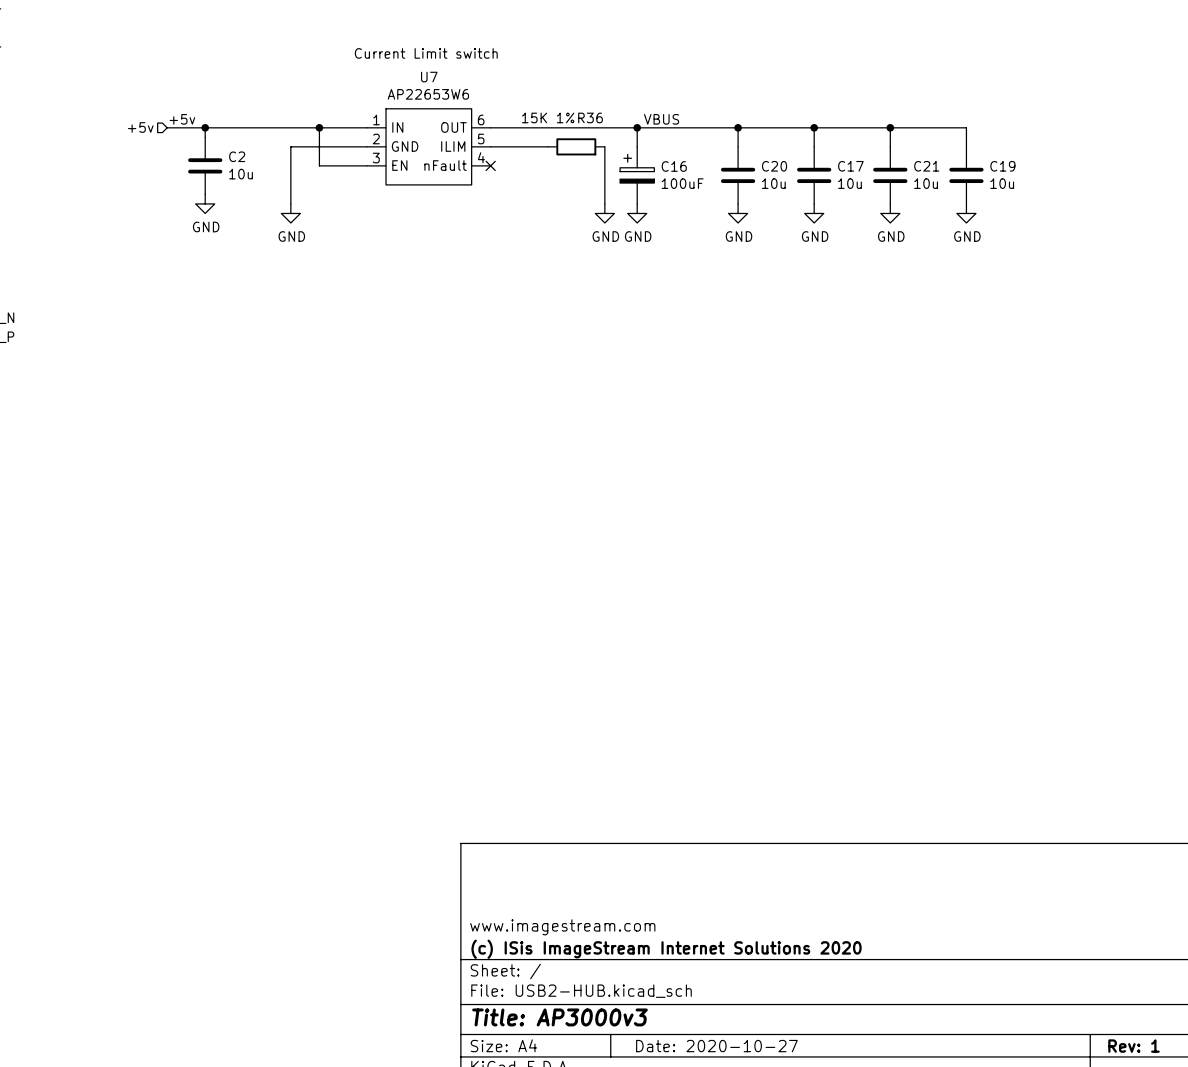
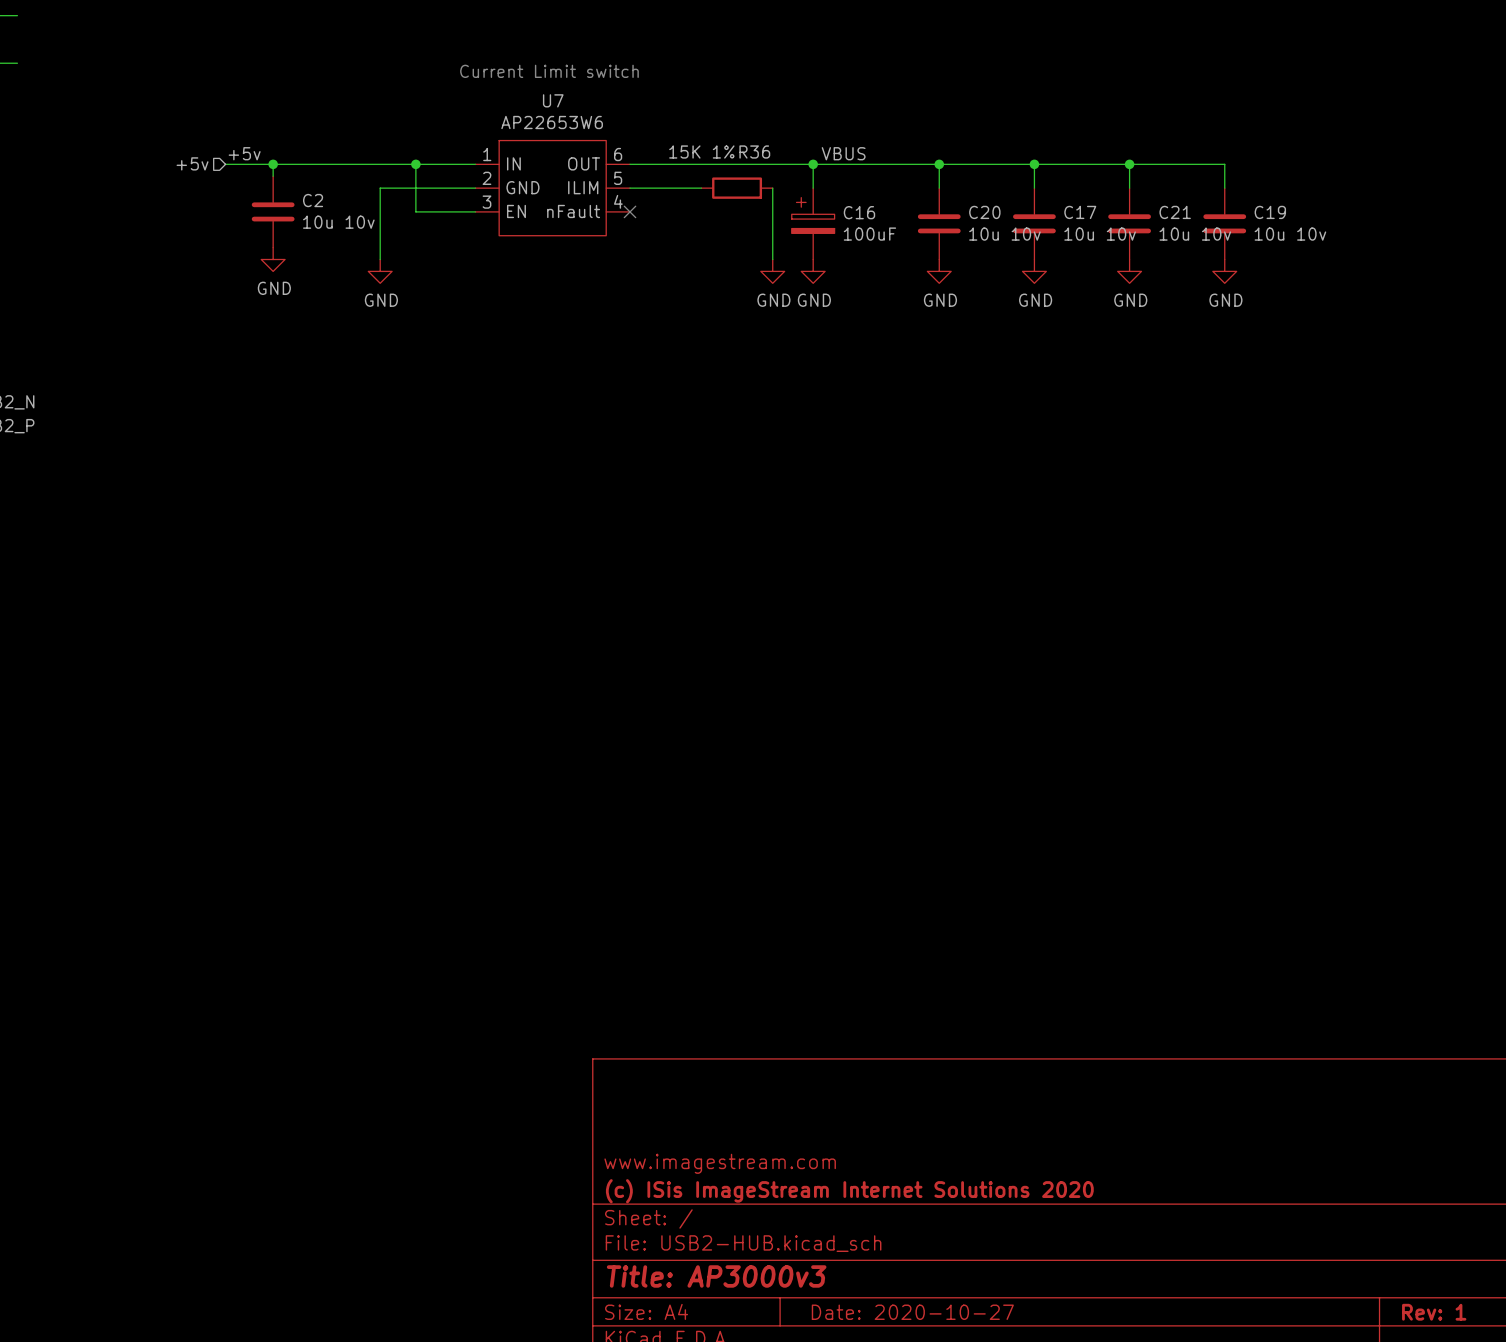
C2 value: 10u (241, 174) -> 10u 10v (338, 222)
C20 value: 10u (773, 183) -> 10u 10v (1004, 234)
C17 value: 10u (849, 183) -> 10u 10v (1100, 234)
C21 value: 10u (926, 183) -> 10u 10v (1195, 234)
C19 value: 10u (1002, 183) -> 10u 10v (1290, 234)

